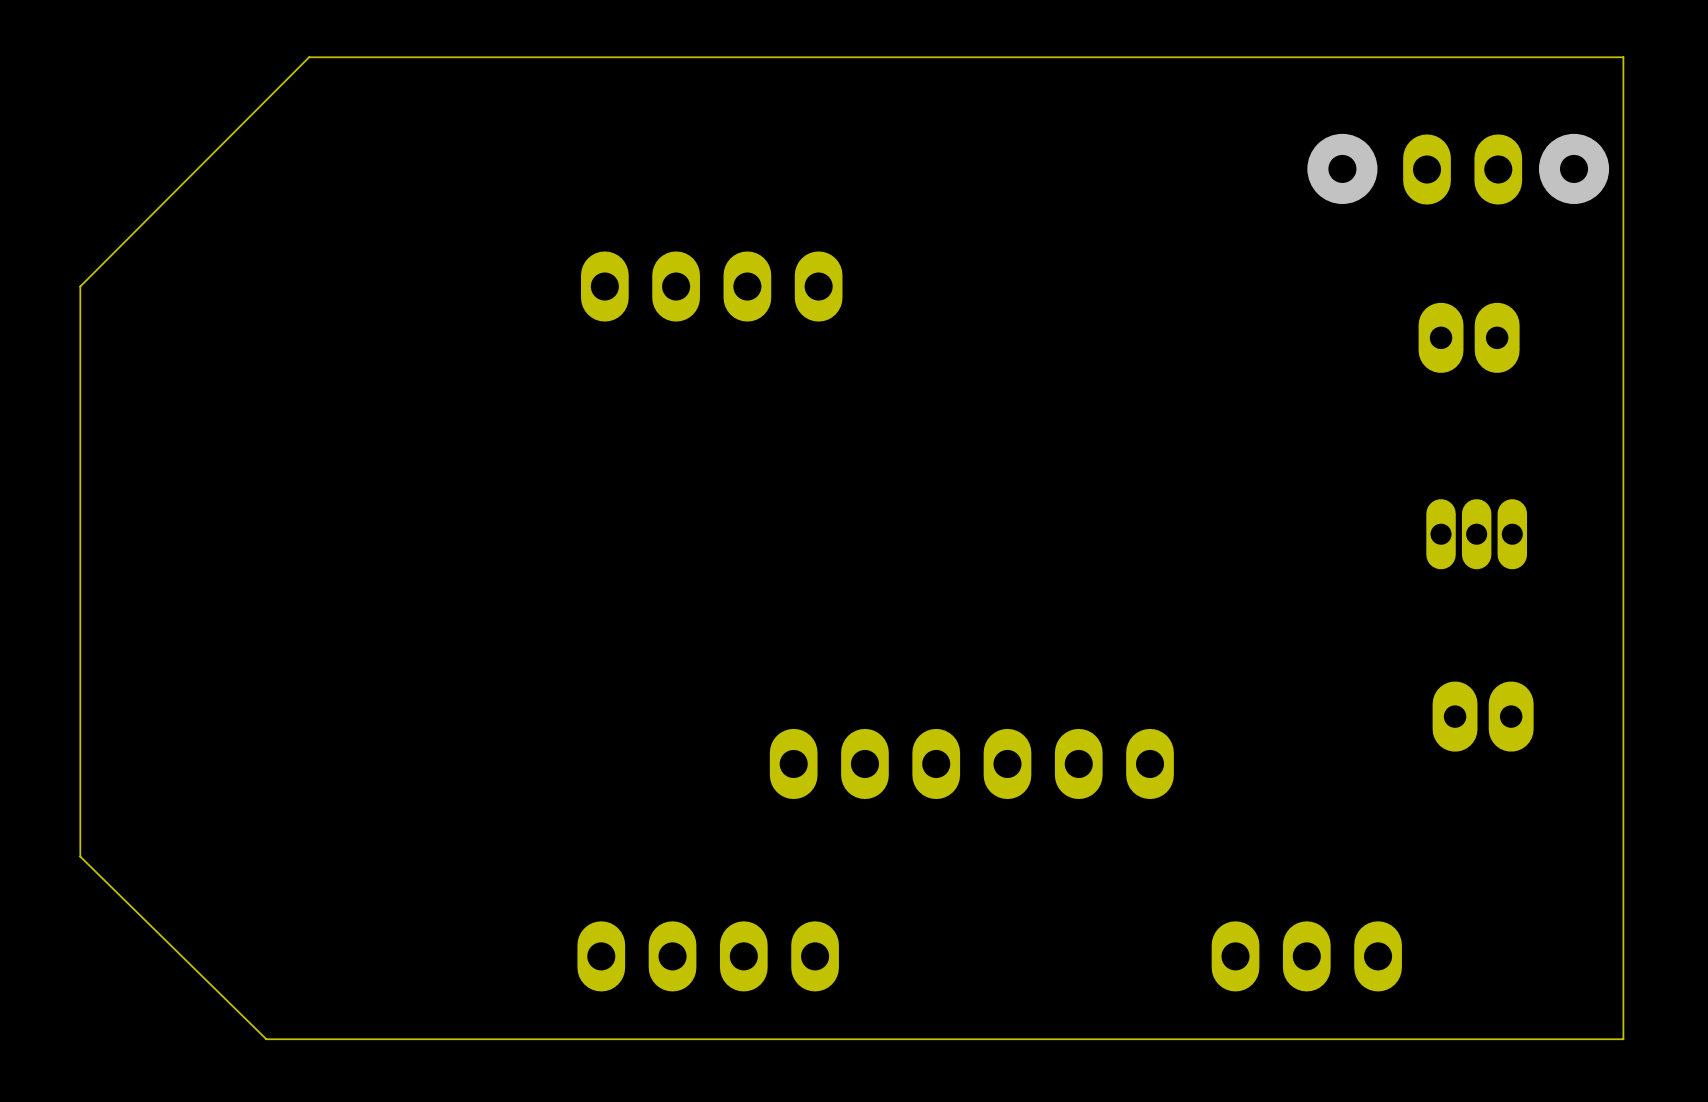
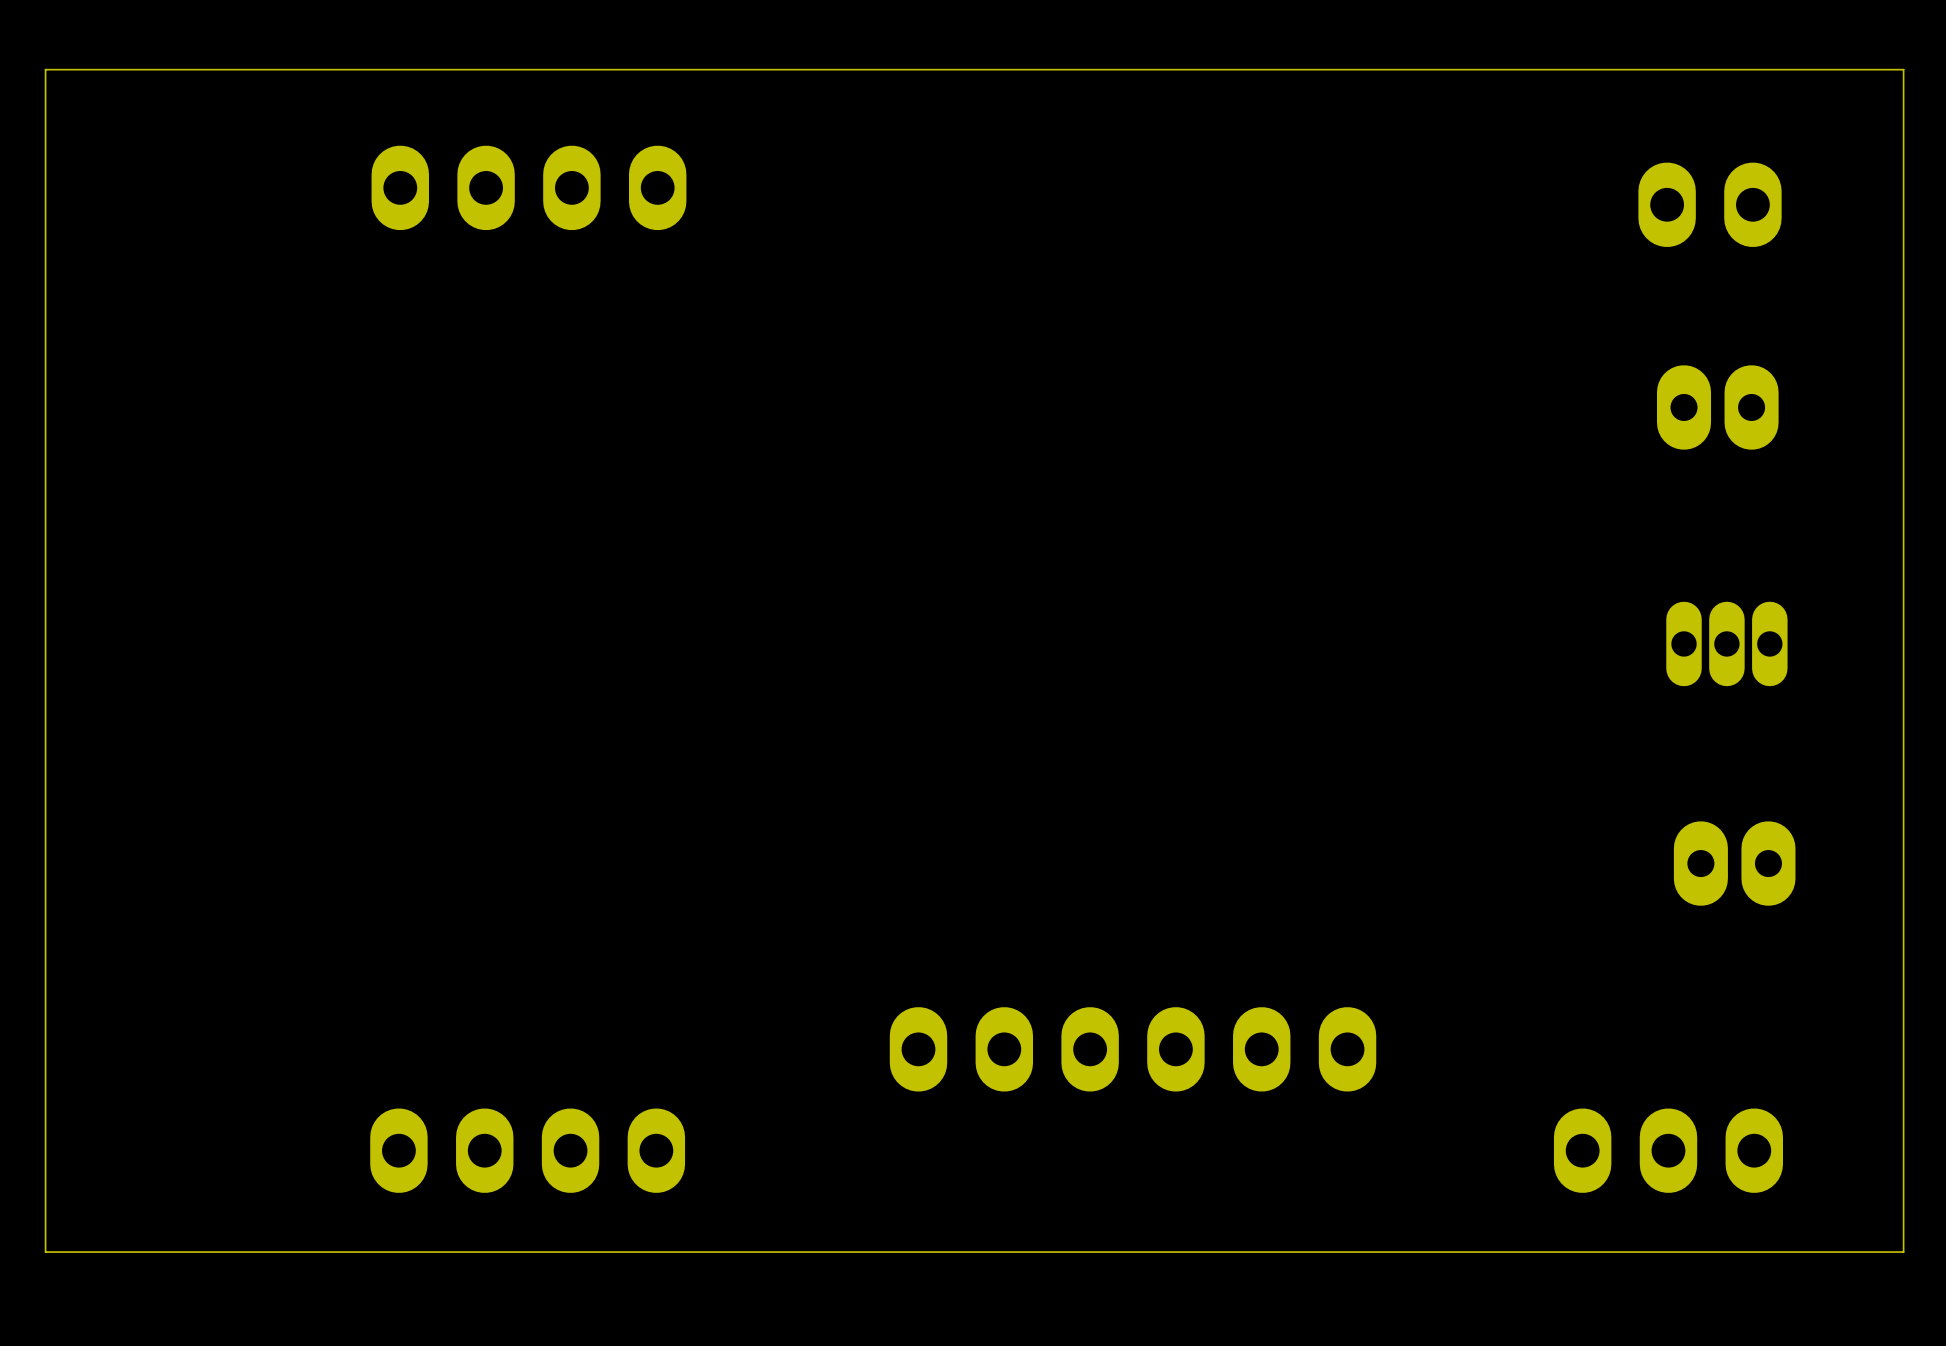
board edge: (309, 57) (80, 286) -> (321, 69) (45, 69) (45, 345)
via: (1342, 168) -> none
via: (1574, 168) -> none
part position: (711, 286) -> (528, 187)
part position: (971, 763) -> (1133, 1049)
board edge: (80, 856) (266, 1039) -> (45, 1032) (45, 1252) (269, 1252)
part position: (708, 956) -> (527, 1150)
part position: (1306, 956) -> (1668, 1150)

